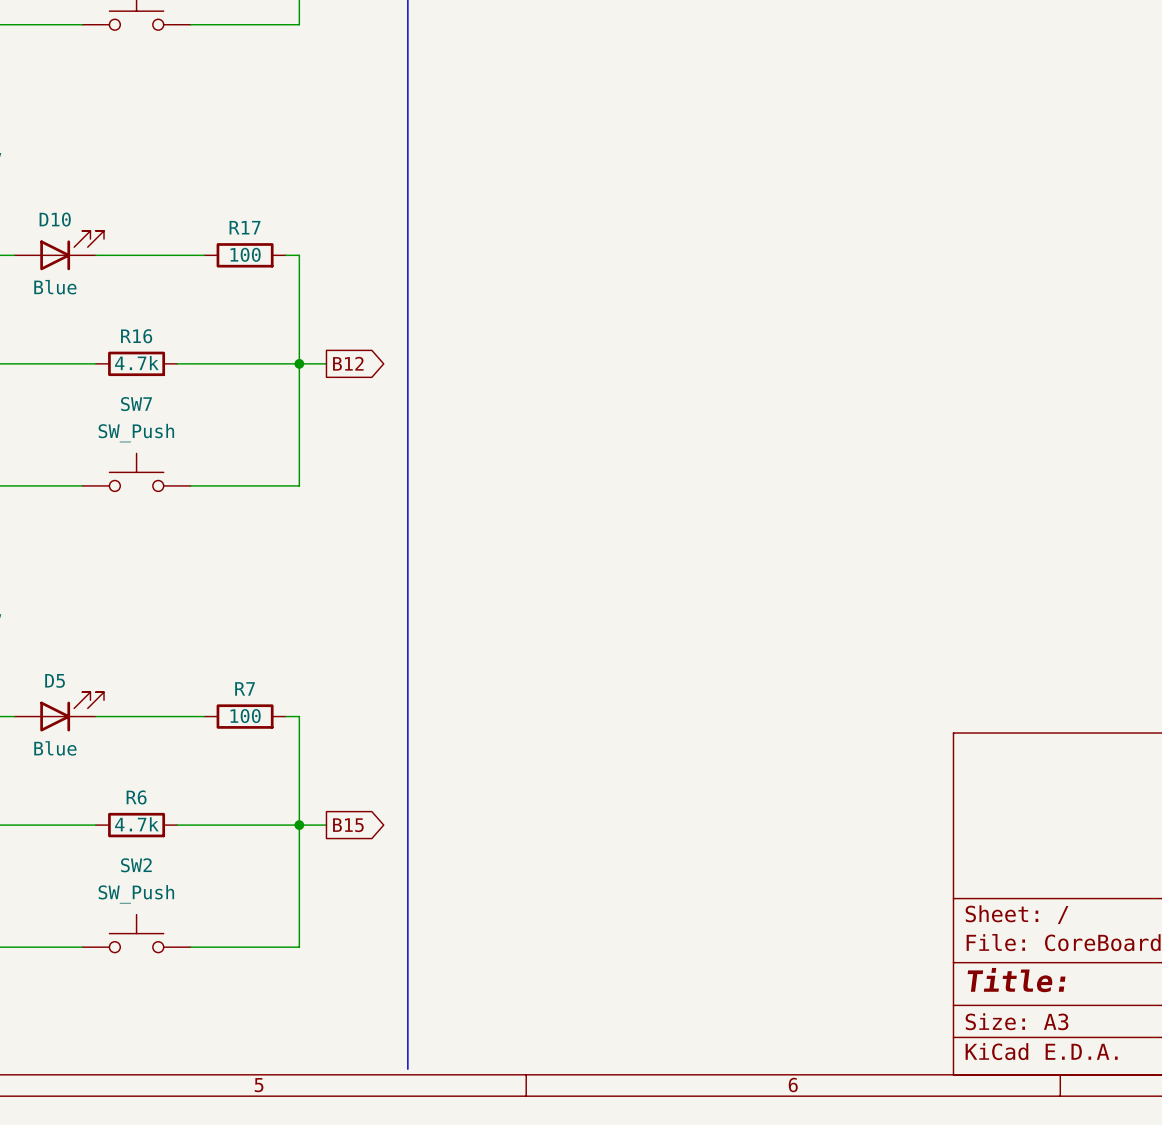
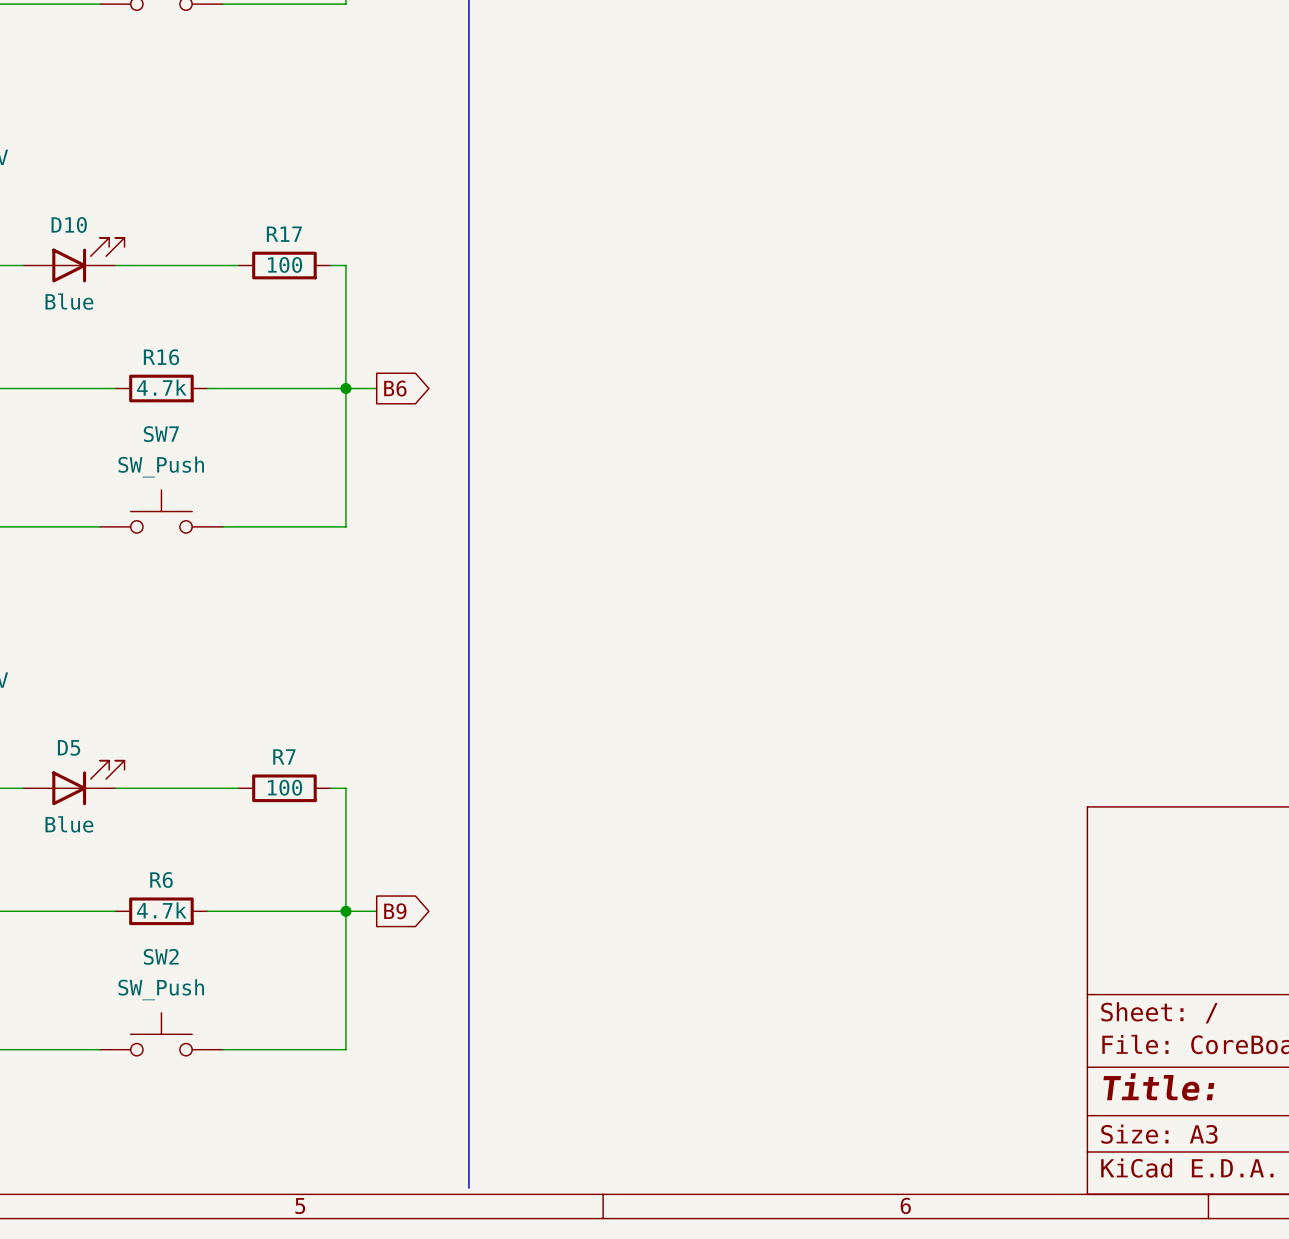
global label: B12 (348, 363) -> B6 (395, 388)
global label: B15 (348, 825) -> B9 (395, 911)

